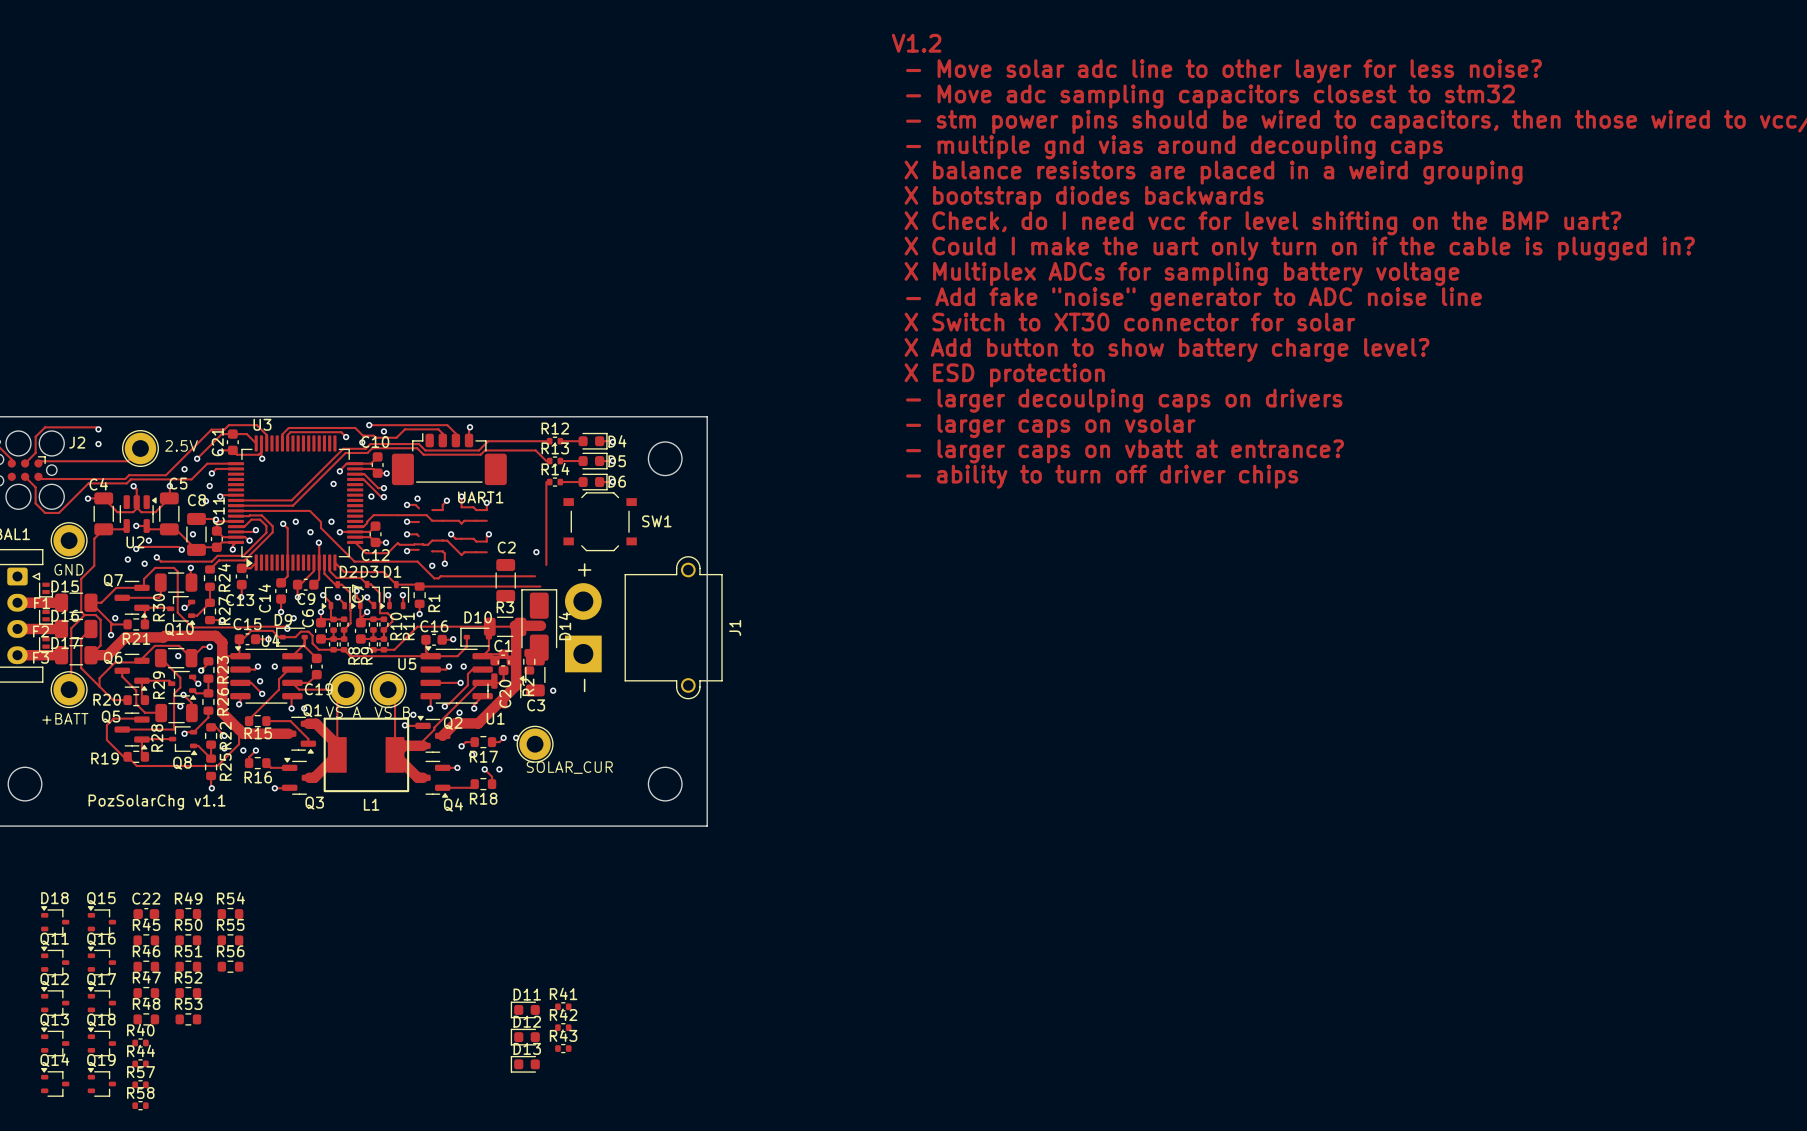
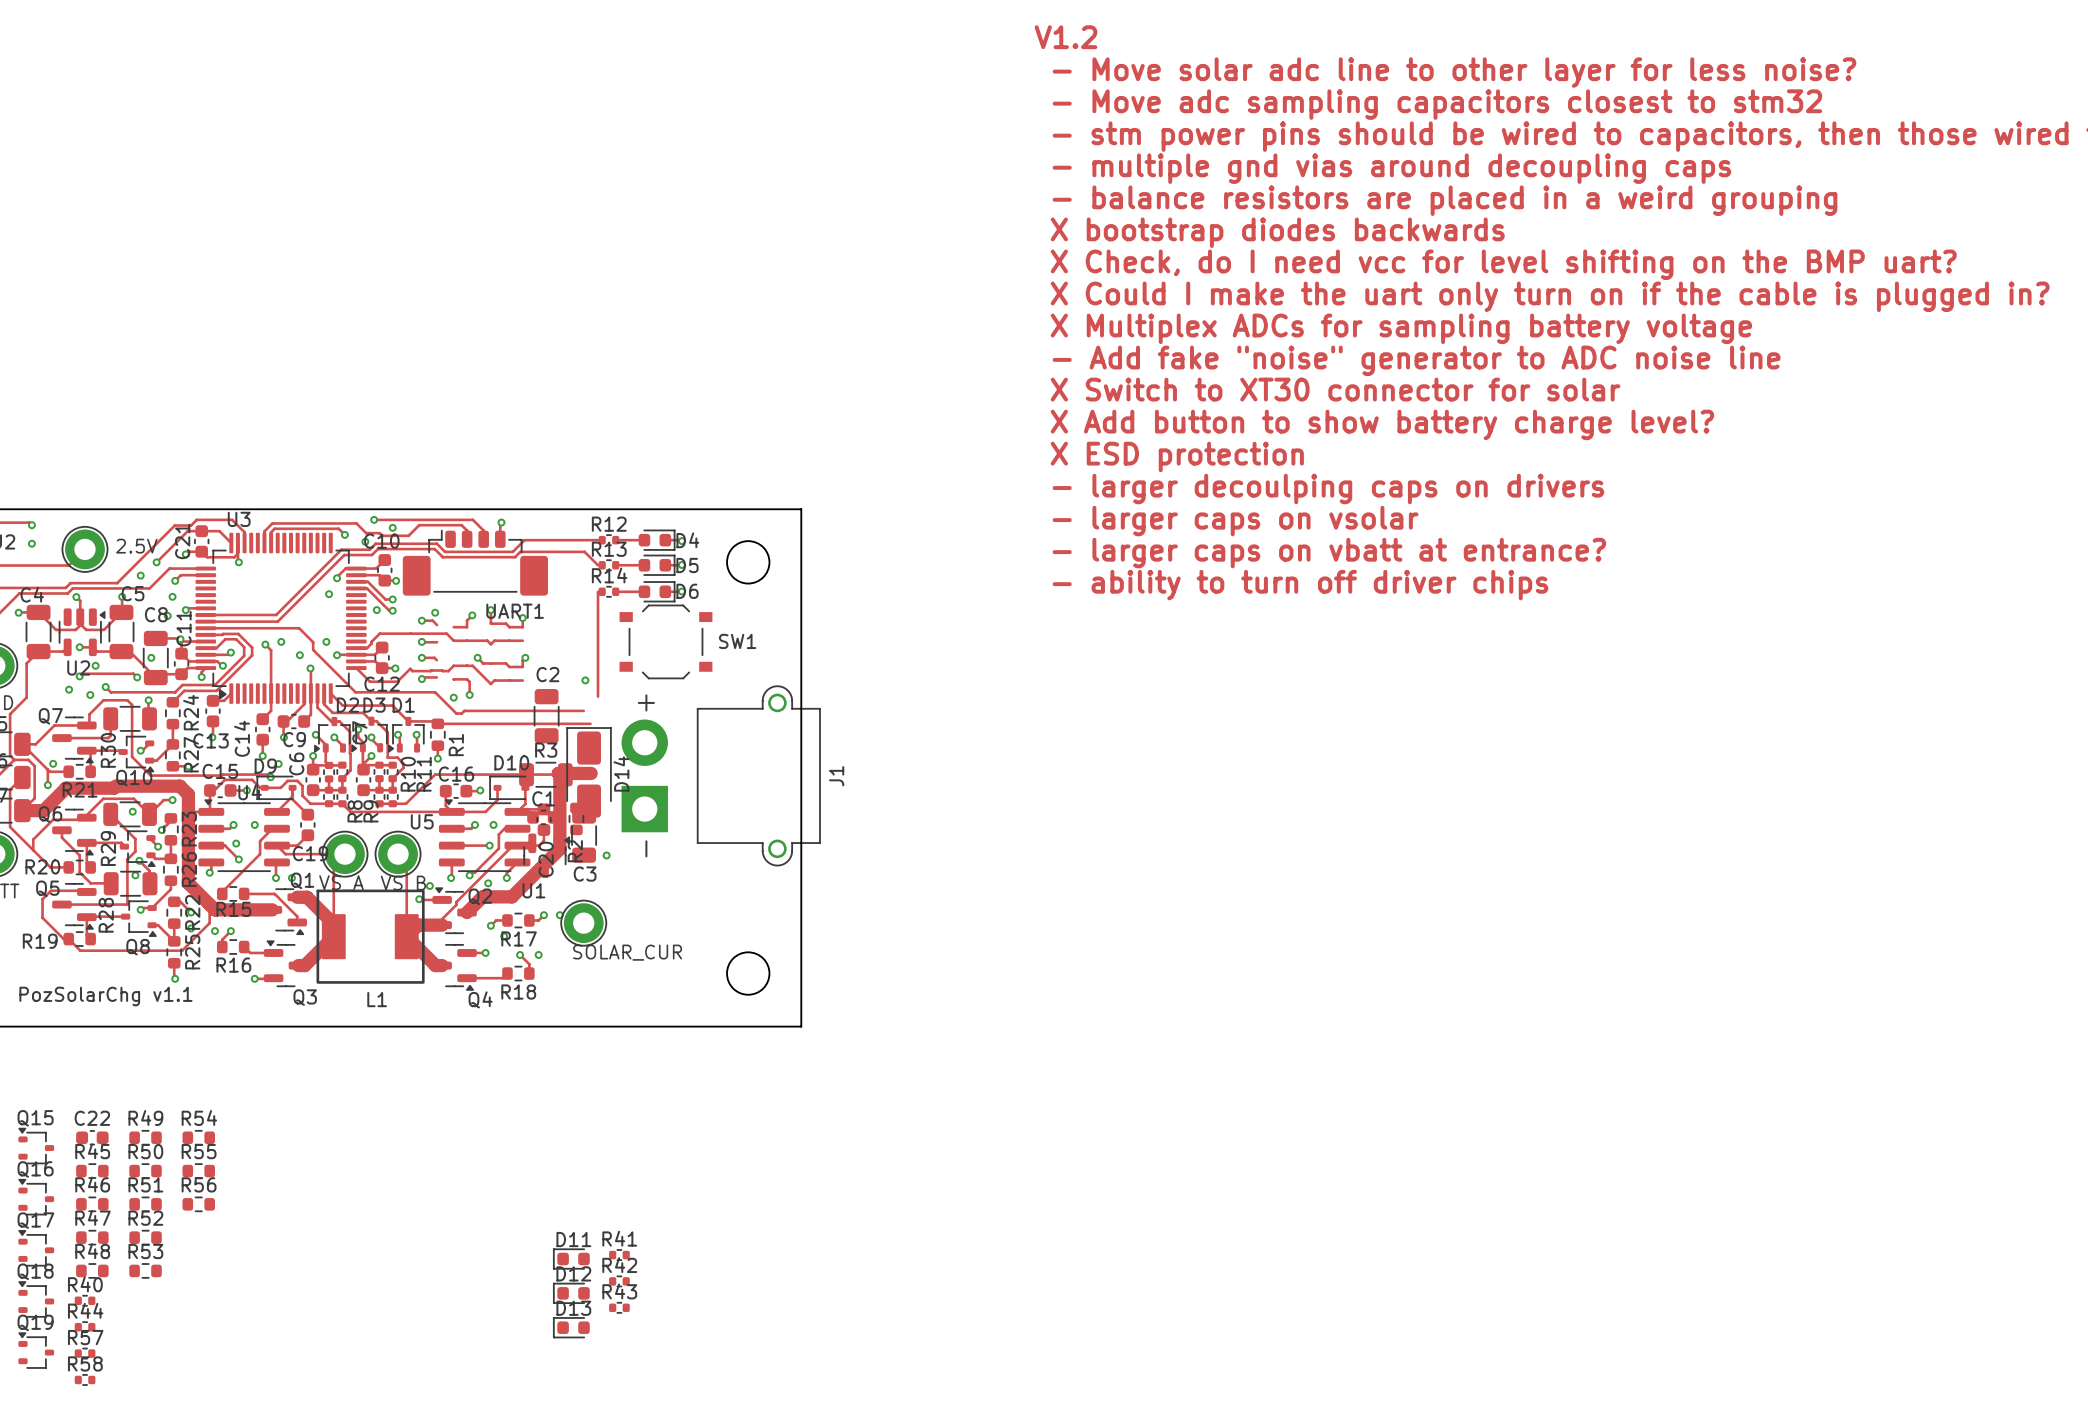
text: X balance resistors are placed in a weird grouping (1213, 172) -> - balance resistors are placed in a weird grouping (1444, 200)

